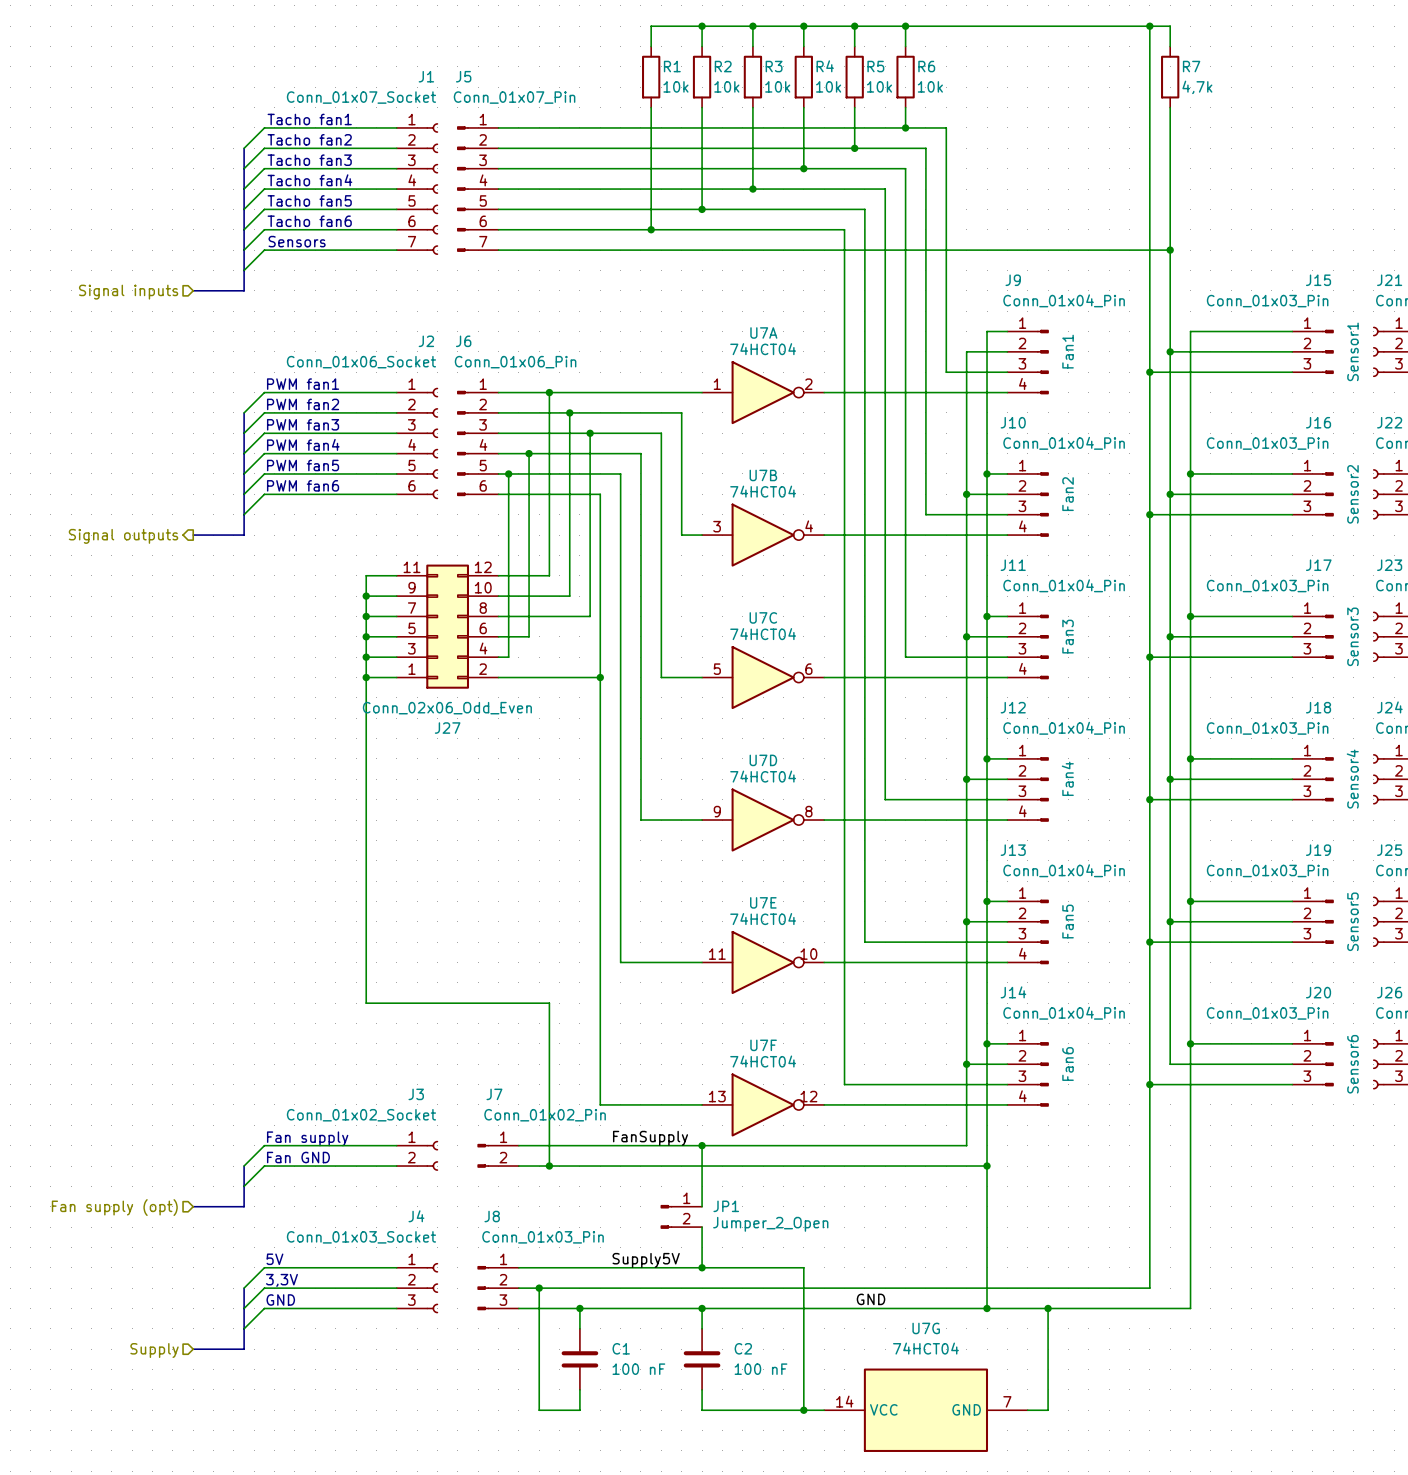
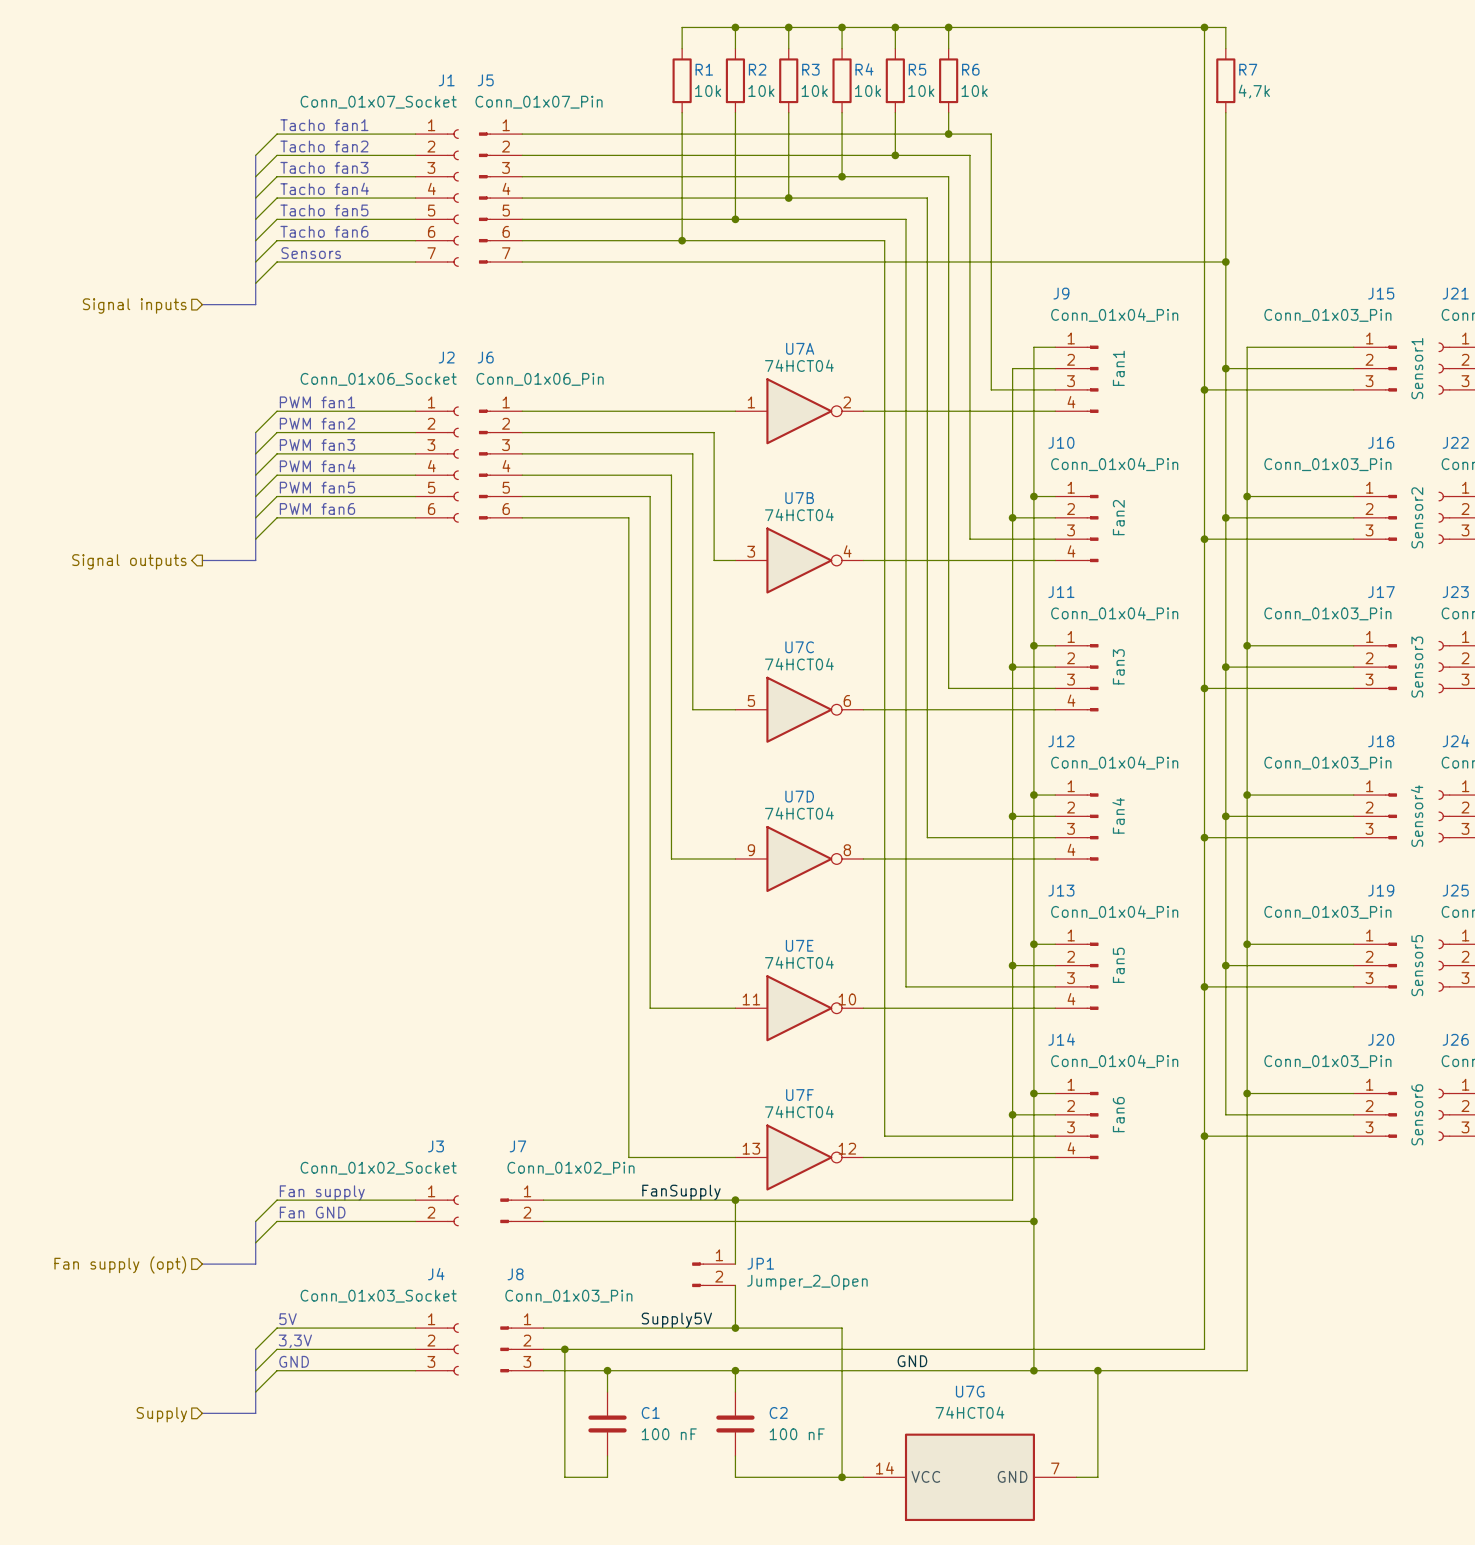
wire: (549, 392) (549, 575) (498, 575) -> none
junction: (549, 392) -> none
wire: (569, 412) (569, 596) (498, 596) -> none
junction: (569, 412) -> none
wire: (590, 433) (590, 616) (498, 616) -> none
junction: (590, 433) -> none
wire: (529, 453) (529, 636) (498, 636) -> none
junction: (529, 453) -> none
wire: (508, 473) (508, 657) (498, 657) -> none
junction: (508, 473) -> none
wire: (396, 575) (366, 575) (366, 1003) (549, 1003) (549, 1166) -> none
wire: (366, 596) (396, 596) -> none
junction: (366, 596) -> none
wire: (366, 616) (396, 616) -> none
junction: (366, 616) -> none
J27: Conn_02x06_Odd_Even (447, 626) -> none
wire: (366, 636) (396, 636) -> none
junction: (366, 636) -> none
wire: (366, 657) (396, 657) -> none
junction: (366, 657) -> none
wire: (366, 677) (396, 677) -> none
junction: (366, 677) -> none
wire: (498, 677) (600, 677) -> none
junction: (600, 677) -> none
junction: (549, 1166) -> none

